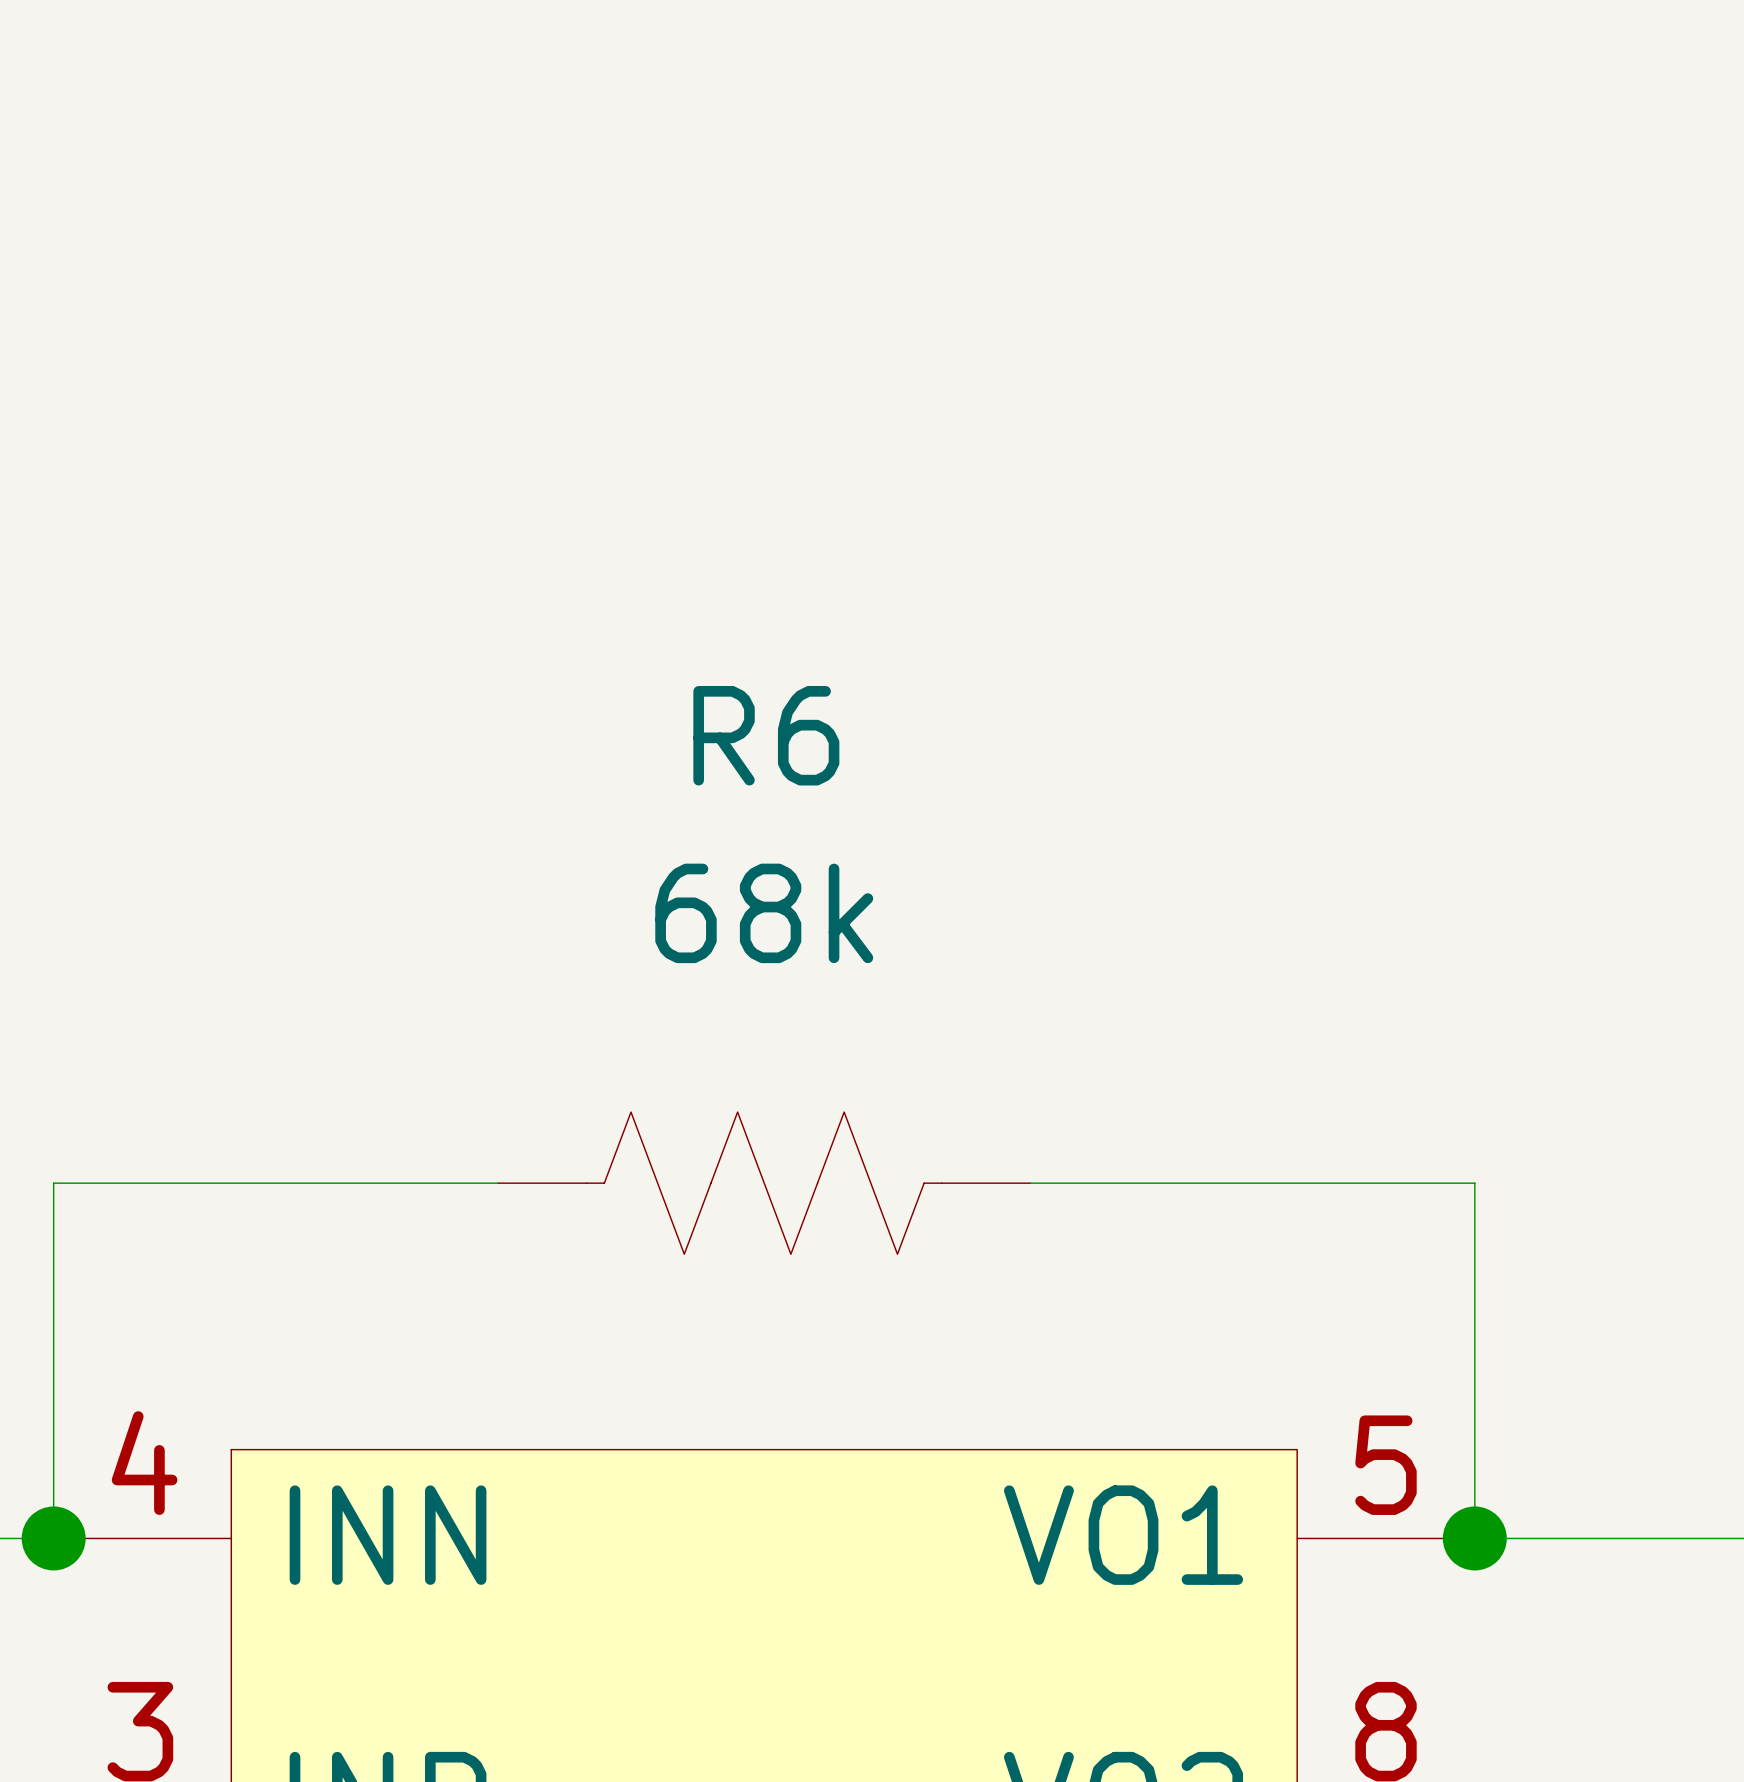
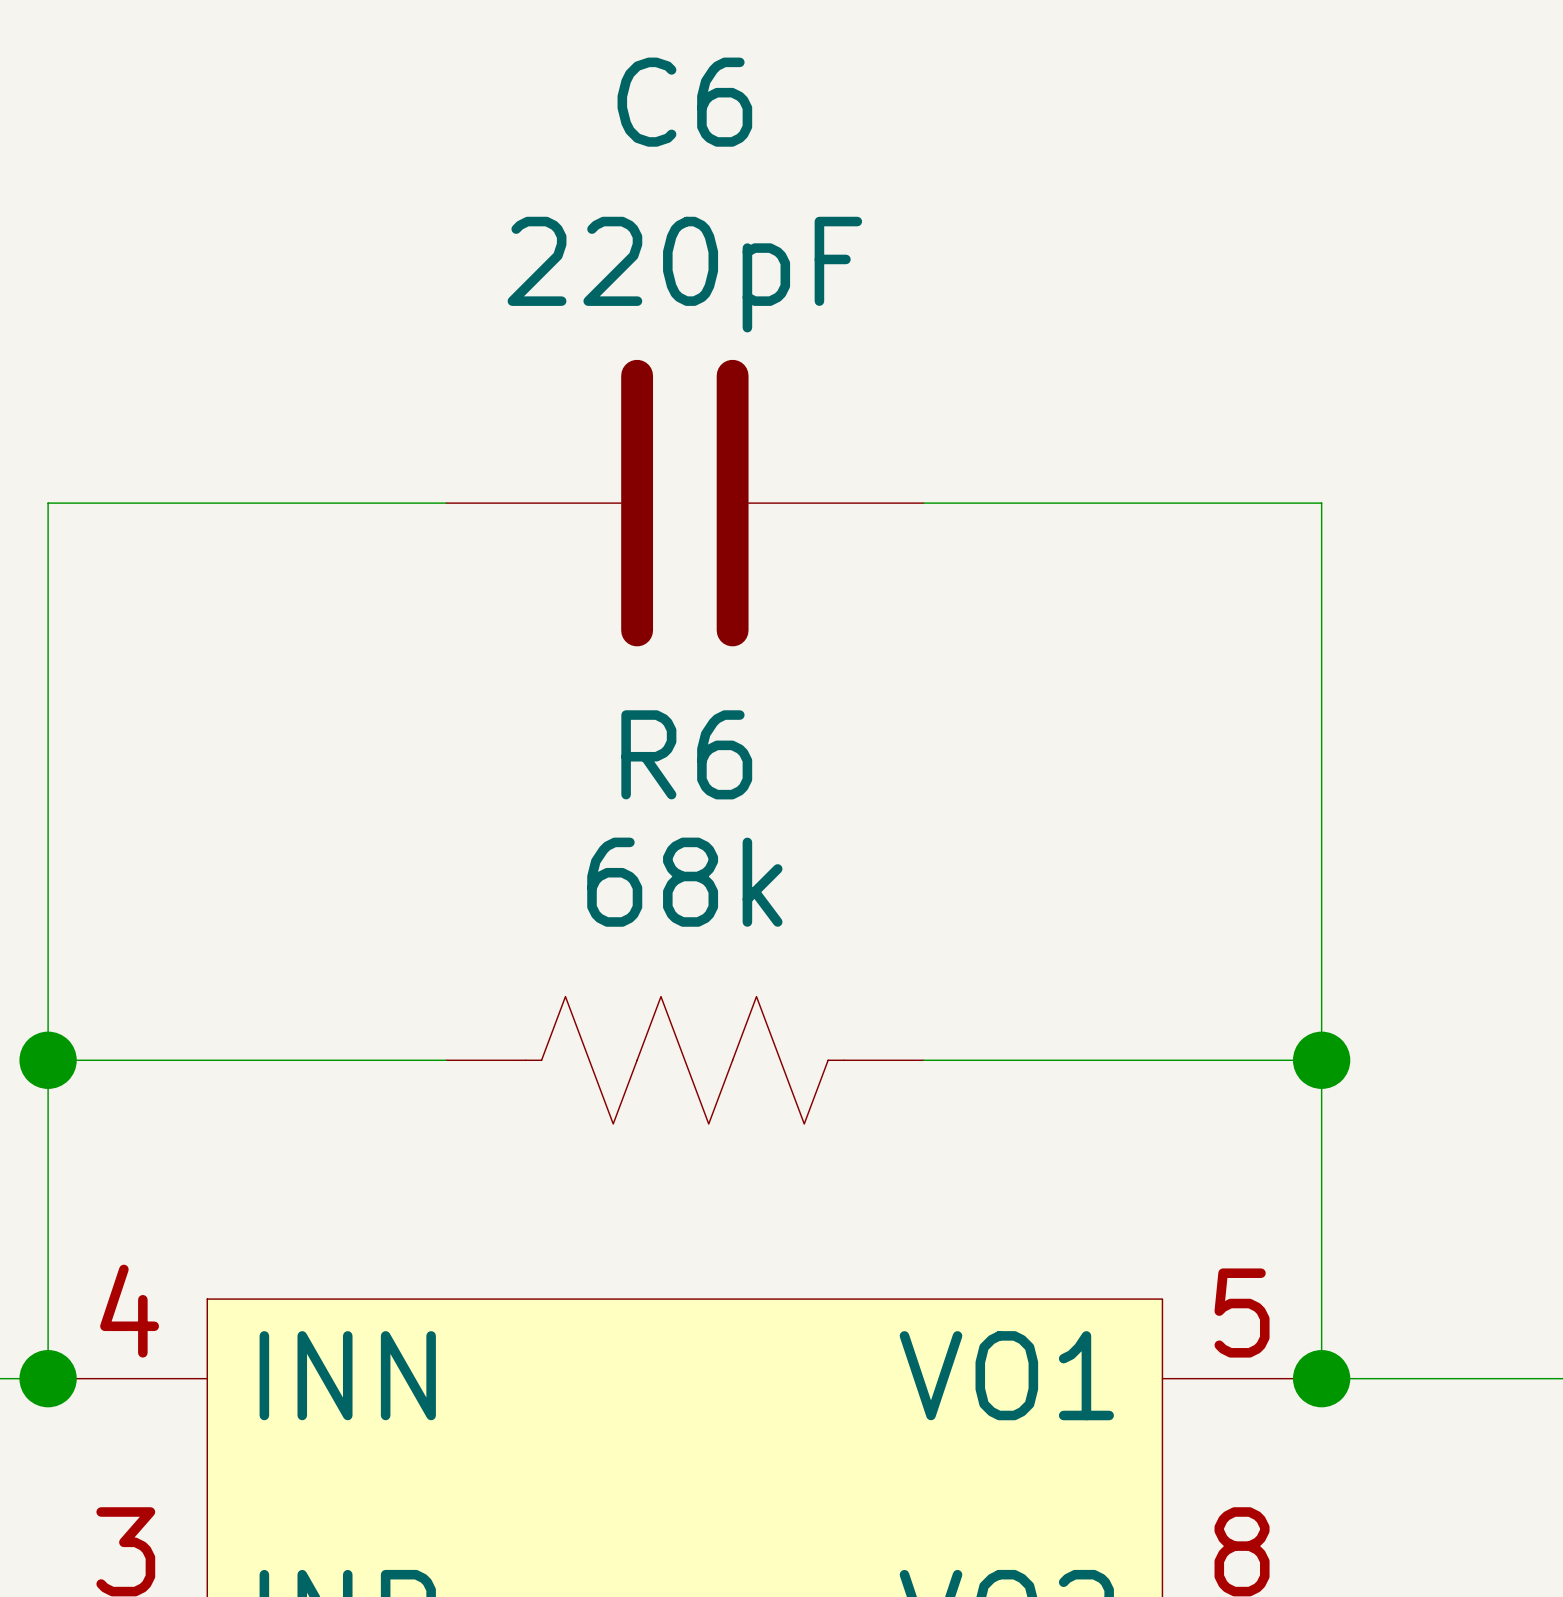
wire: none -> (446, 503) (48, 503) (48, 1060)
C6: none -> 220pF (684, 503)
wire: none -> (923, 503) (1321, 503) (1321, 1060)
R6 name position: R6 (766, 735) -> R6 (686, 754)
R6 value position: 68k (764, 913) -> 68k (684, 882)
junction: none -> (48, 1060)
junction: none -> (1321, 1060)

